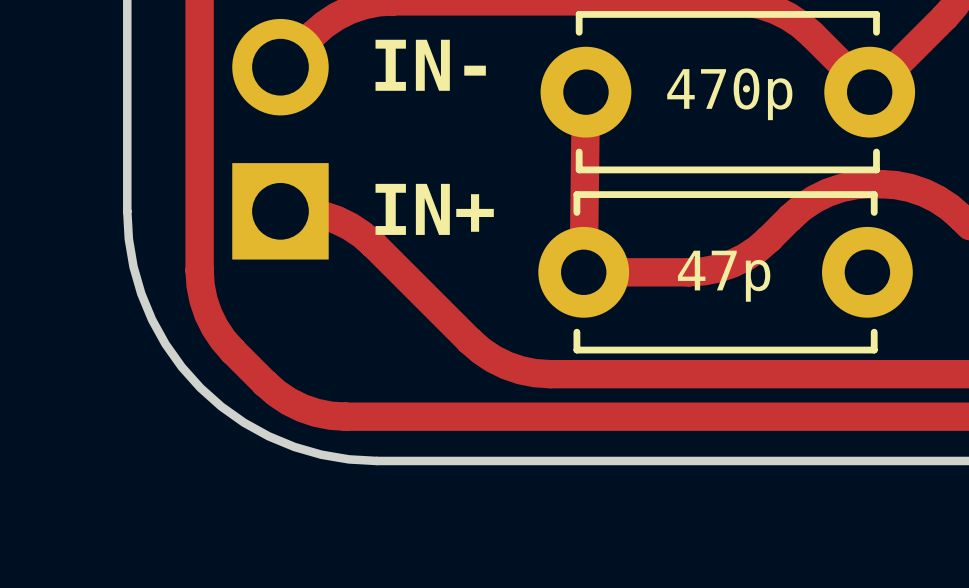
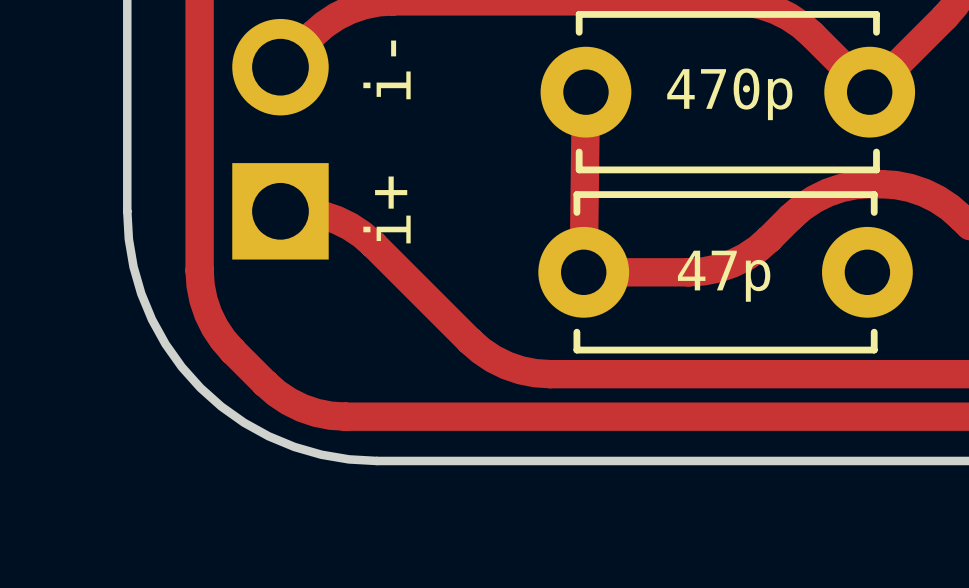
text: IN- (430, 65) -> i- (387, 69)
text: IN+ (434, 209) -> i+ (387, 209)

